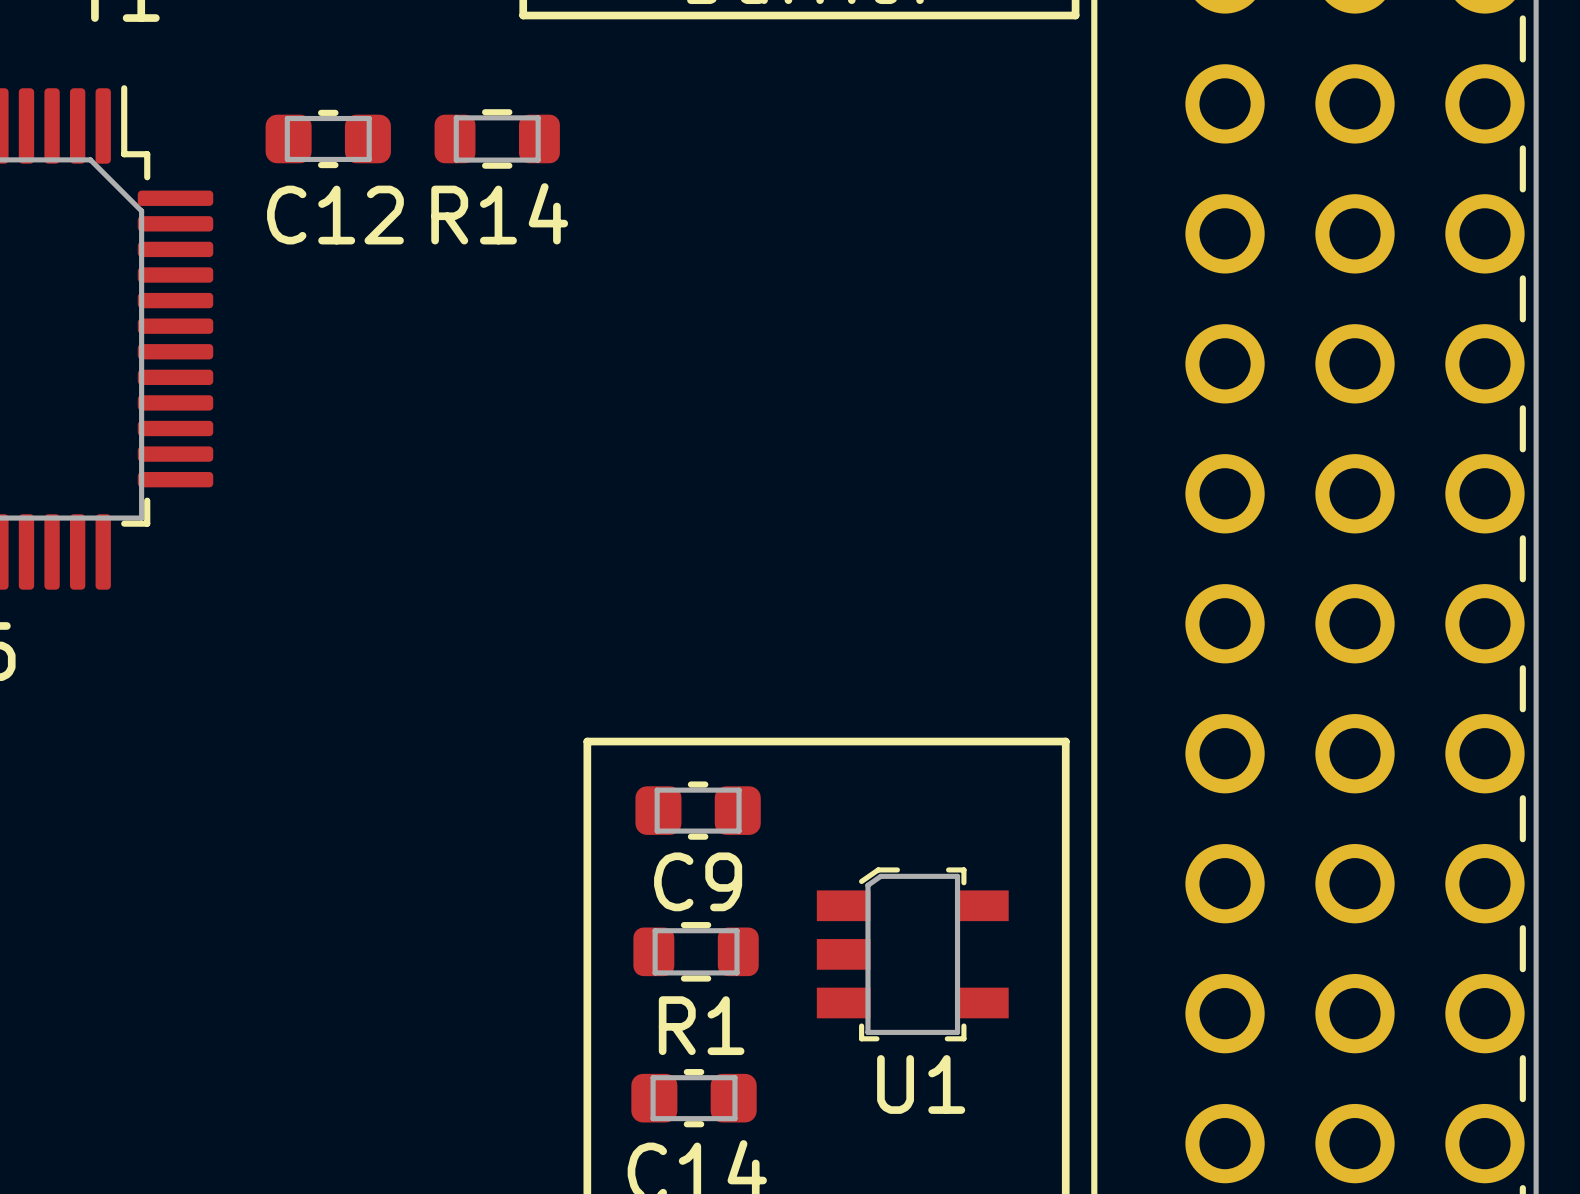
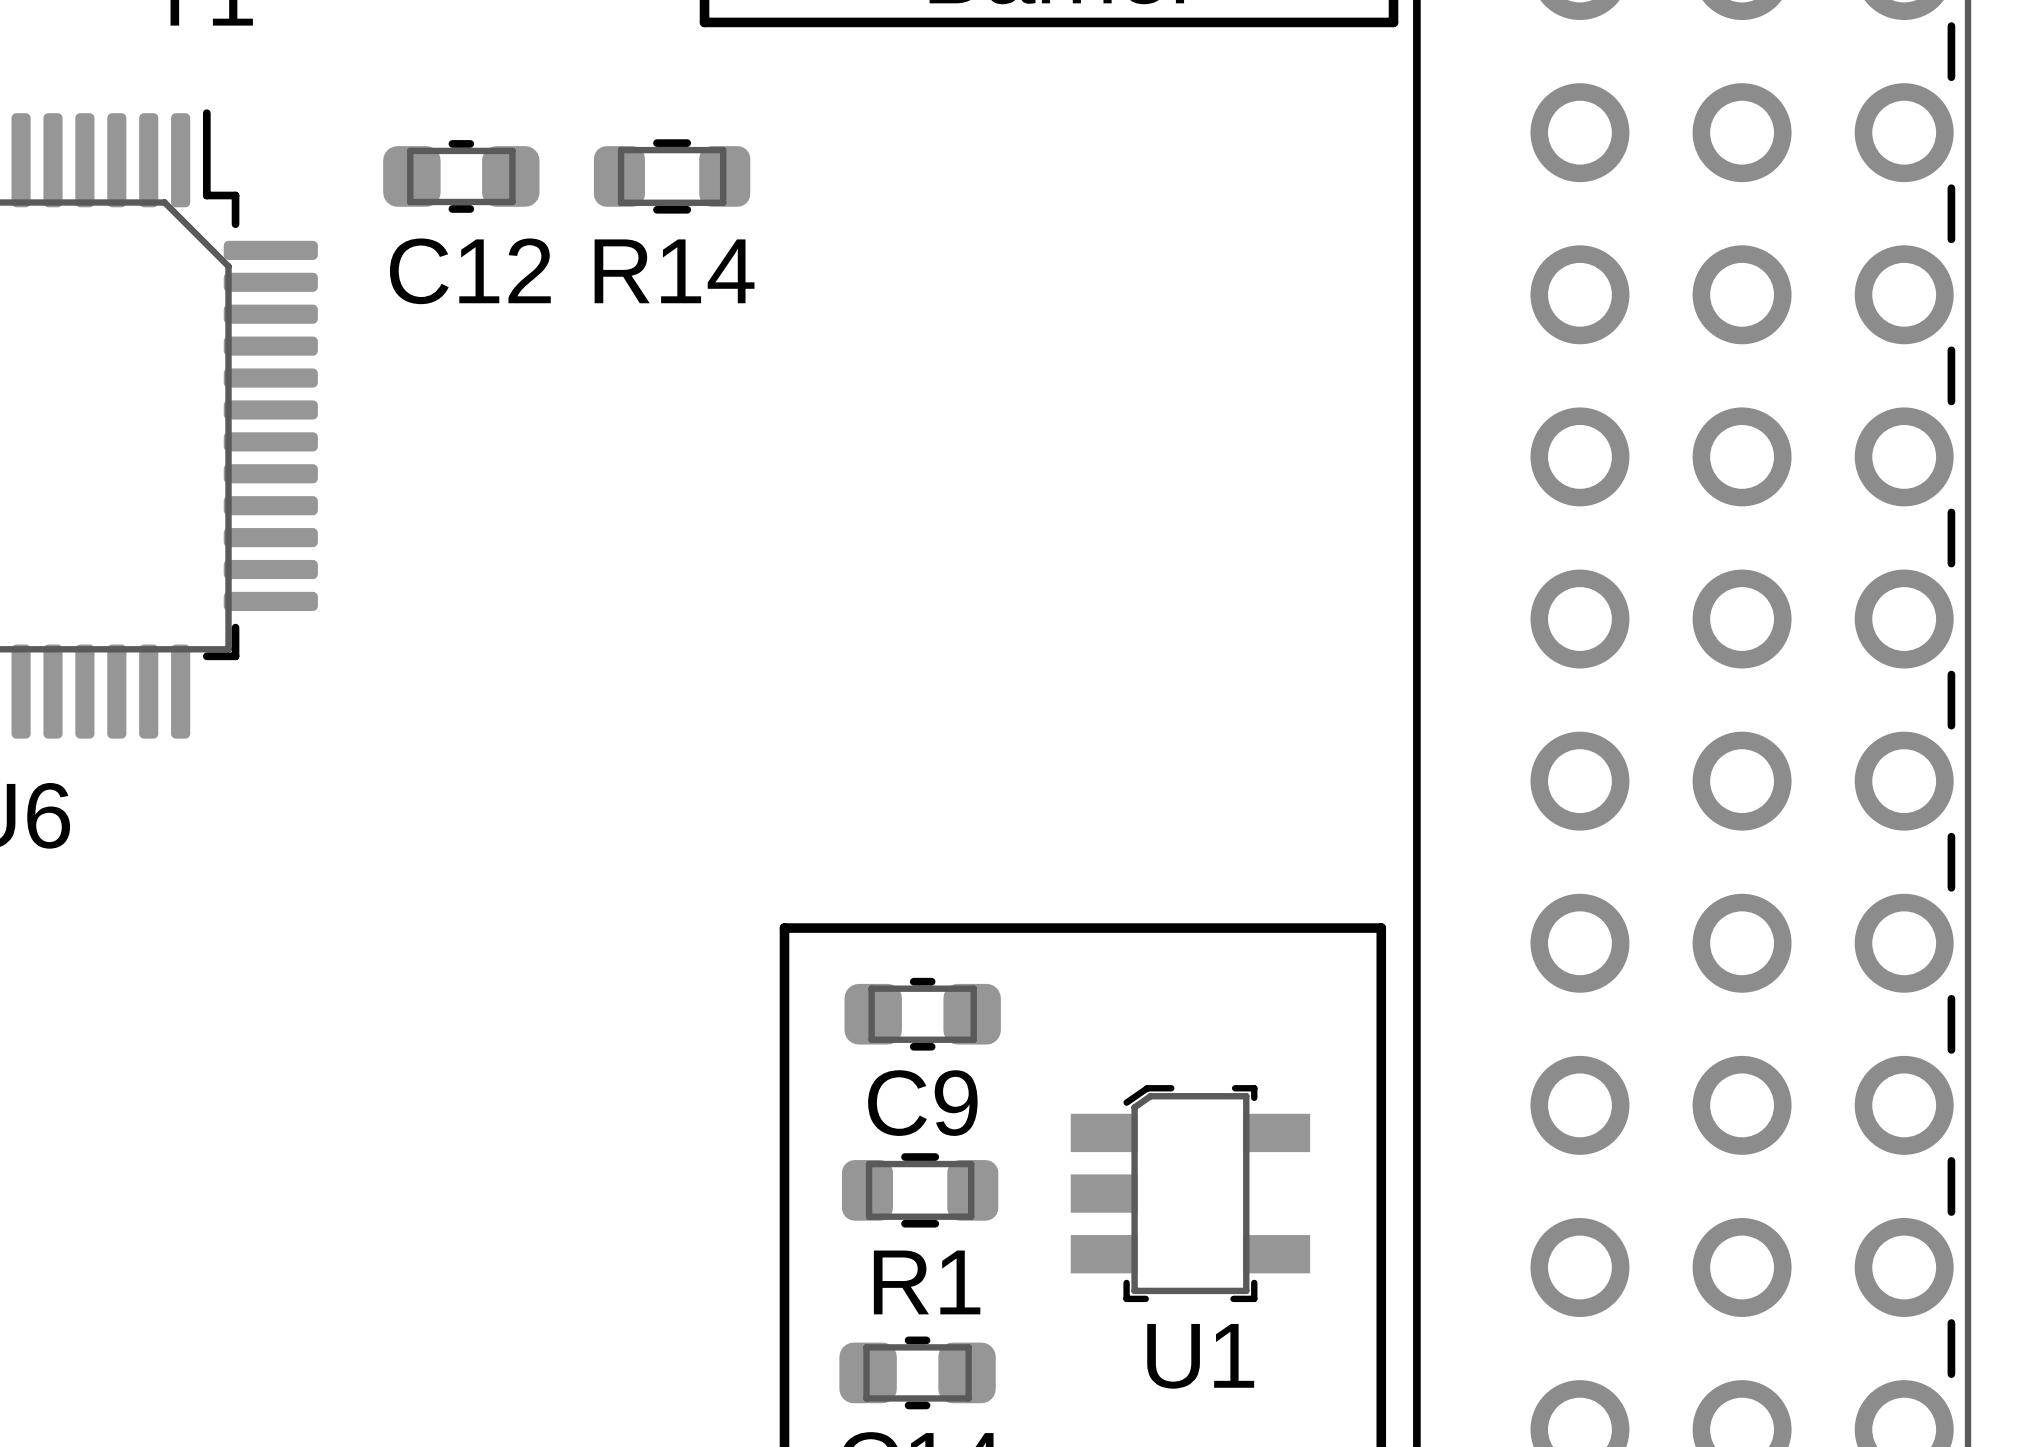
U1 footprint: [816, 867, 1009, 1042] -> [1070, 1085, 1311, 1303]

